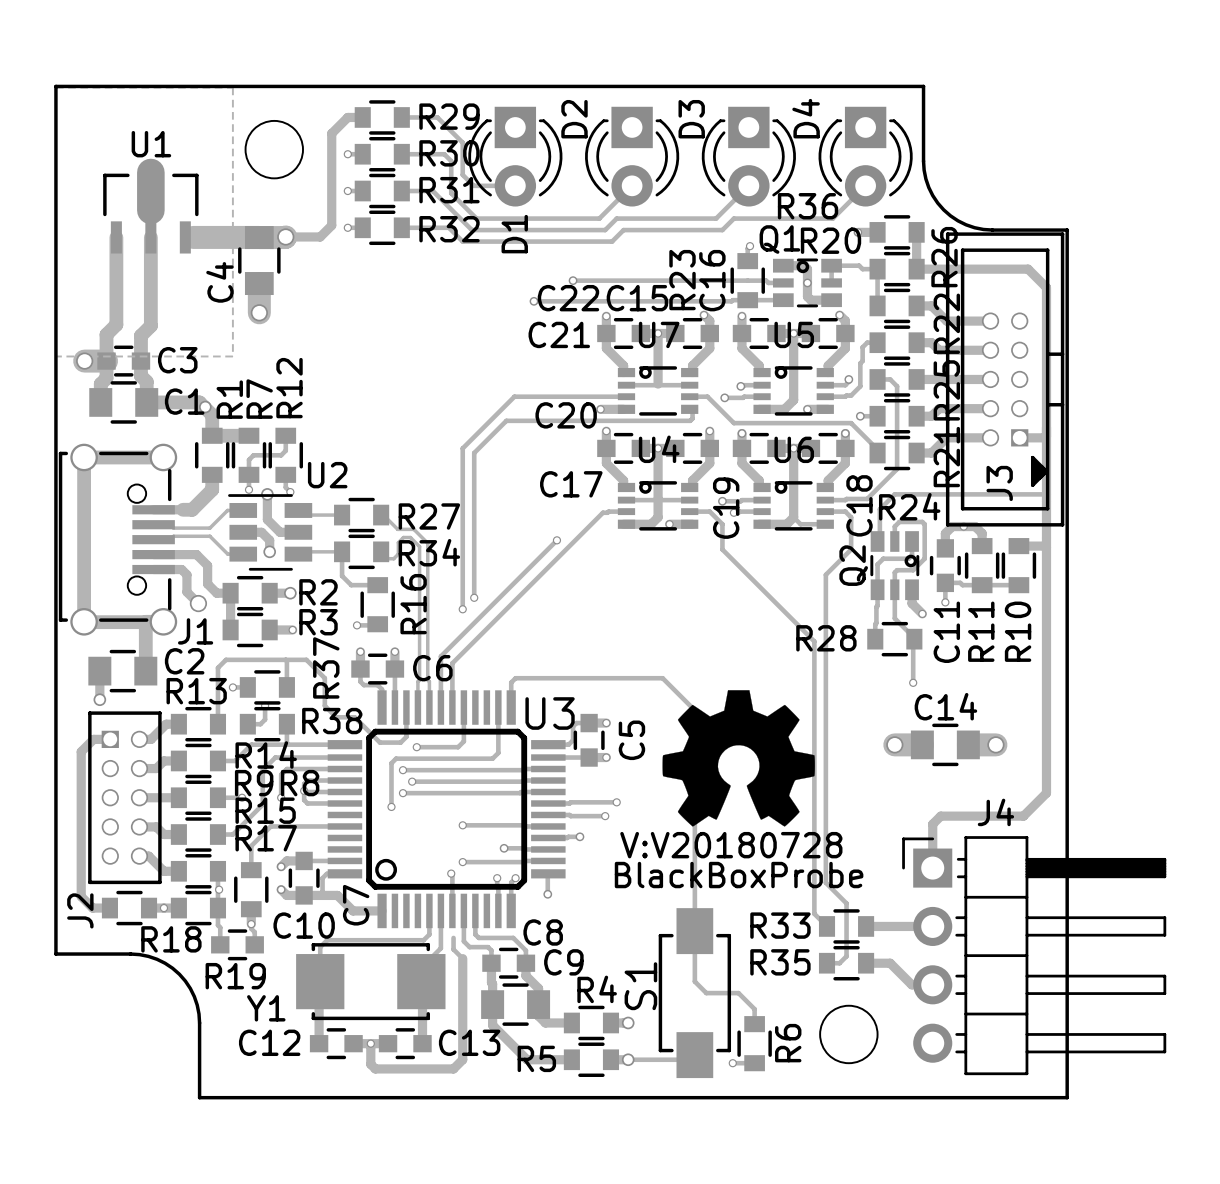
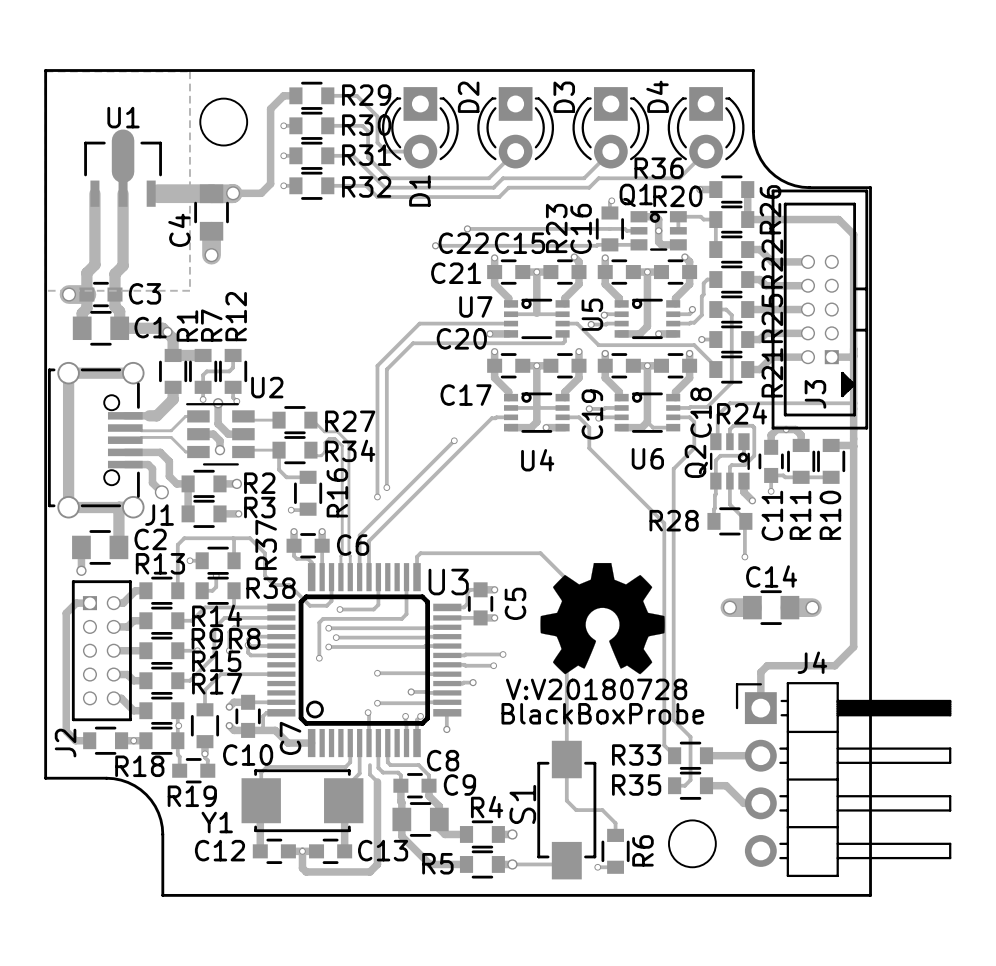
U7 name position: U7 (659, 334) -> U7 (475, 306)
U5 name rotation: 0° (794, 334) -> 90° counterclockwise (592, 314)
U5 name position: U5 (794, 334) -> U5 (592, 314)
U4 name position: U4 (659, 449) -> U4 (537, 460)
U6 name position: U6 (794, 449) -> U6 (647, 458)

